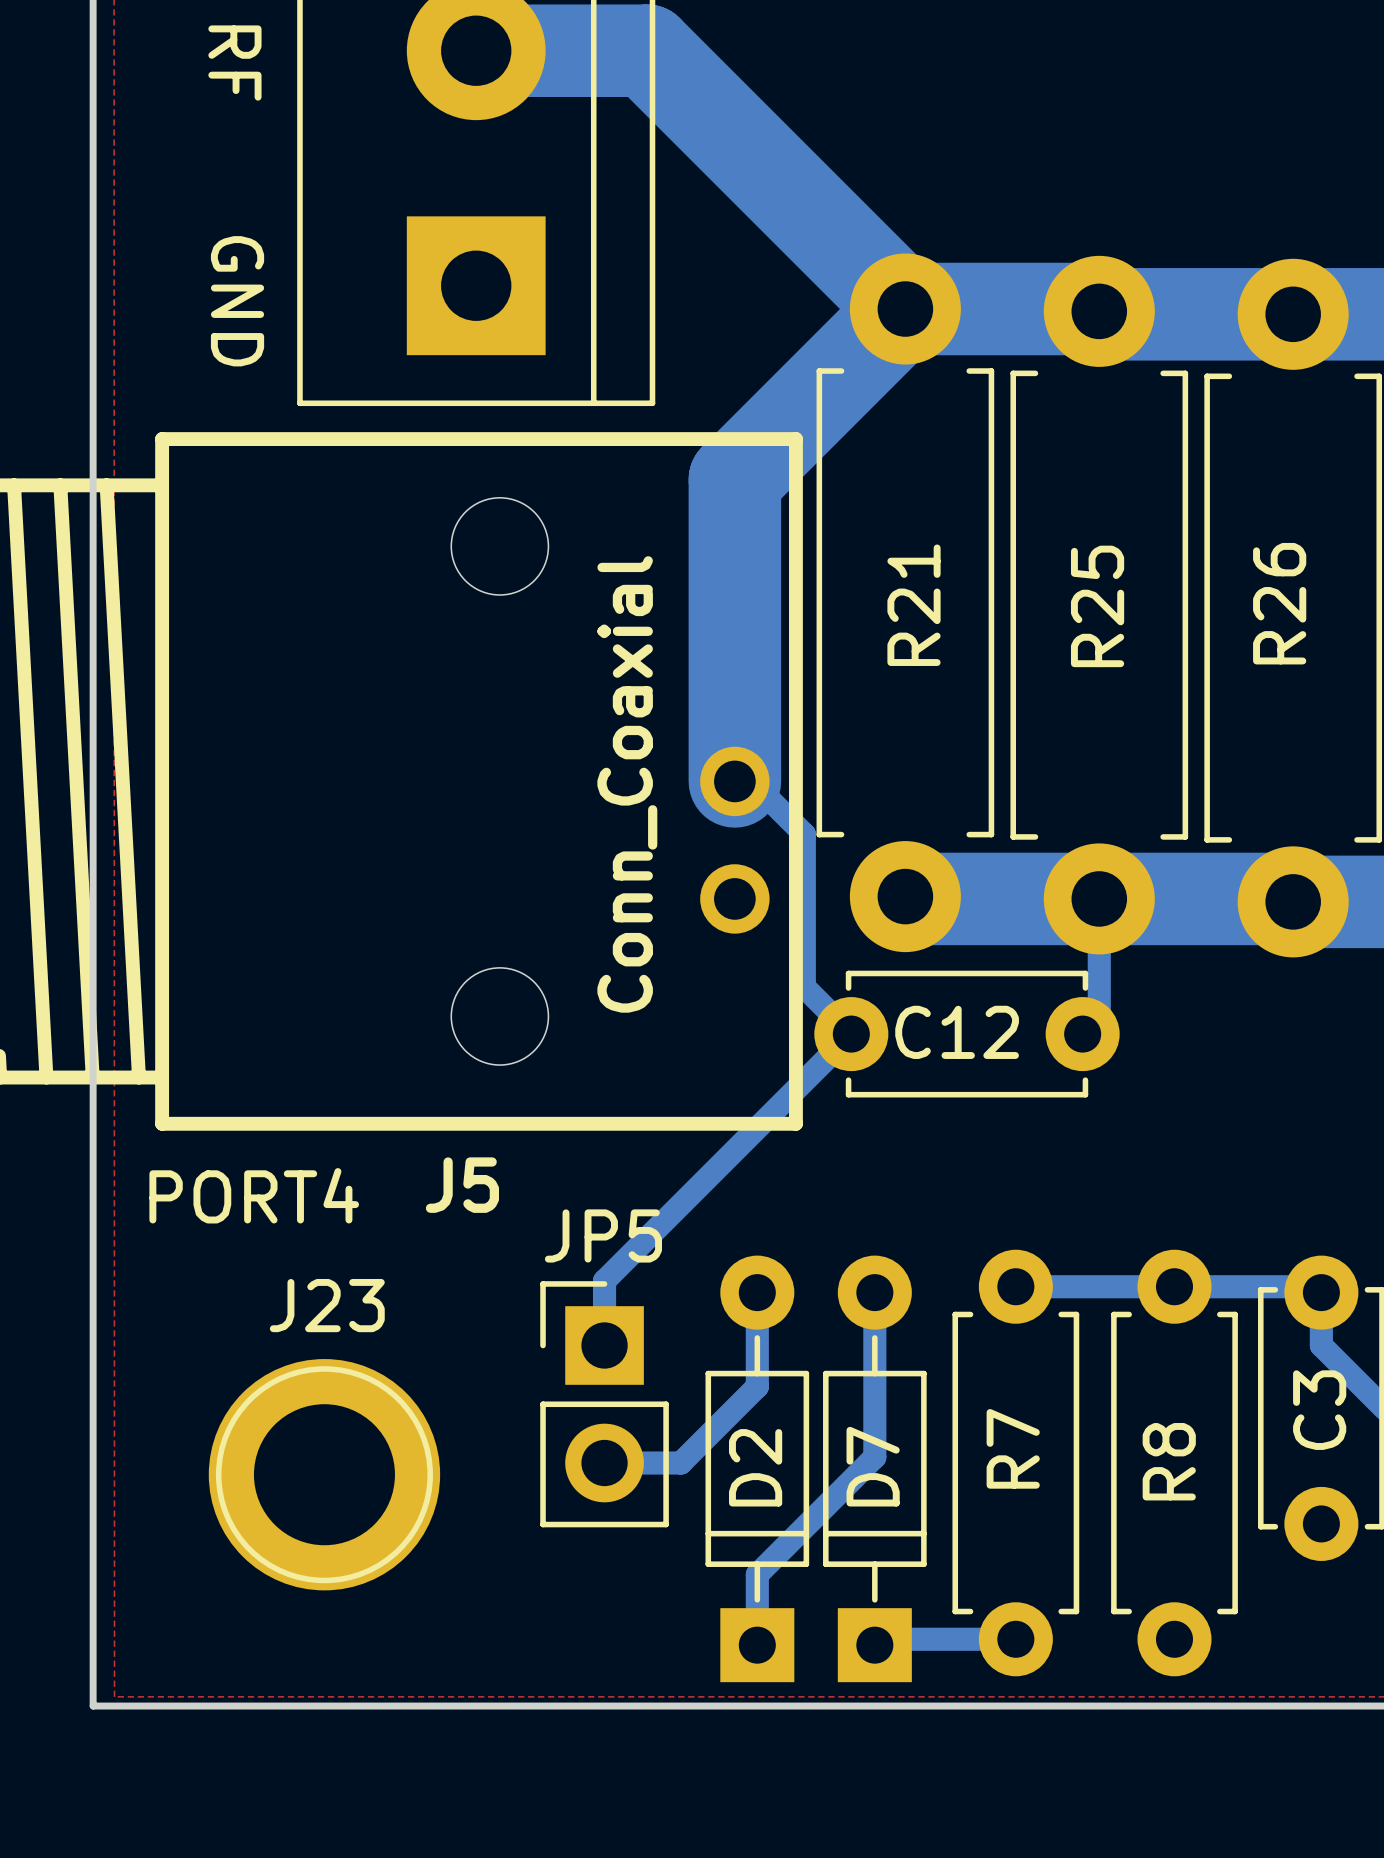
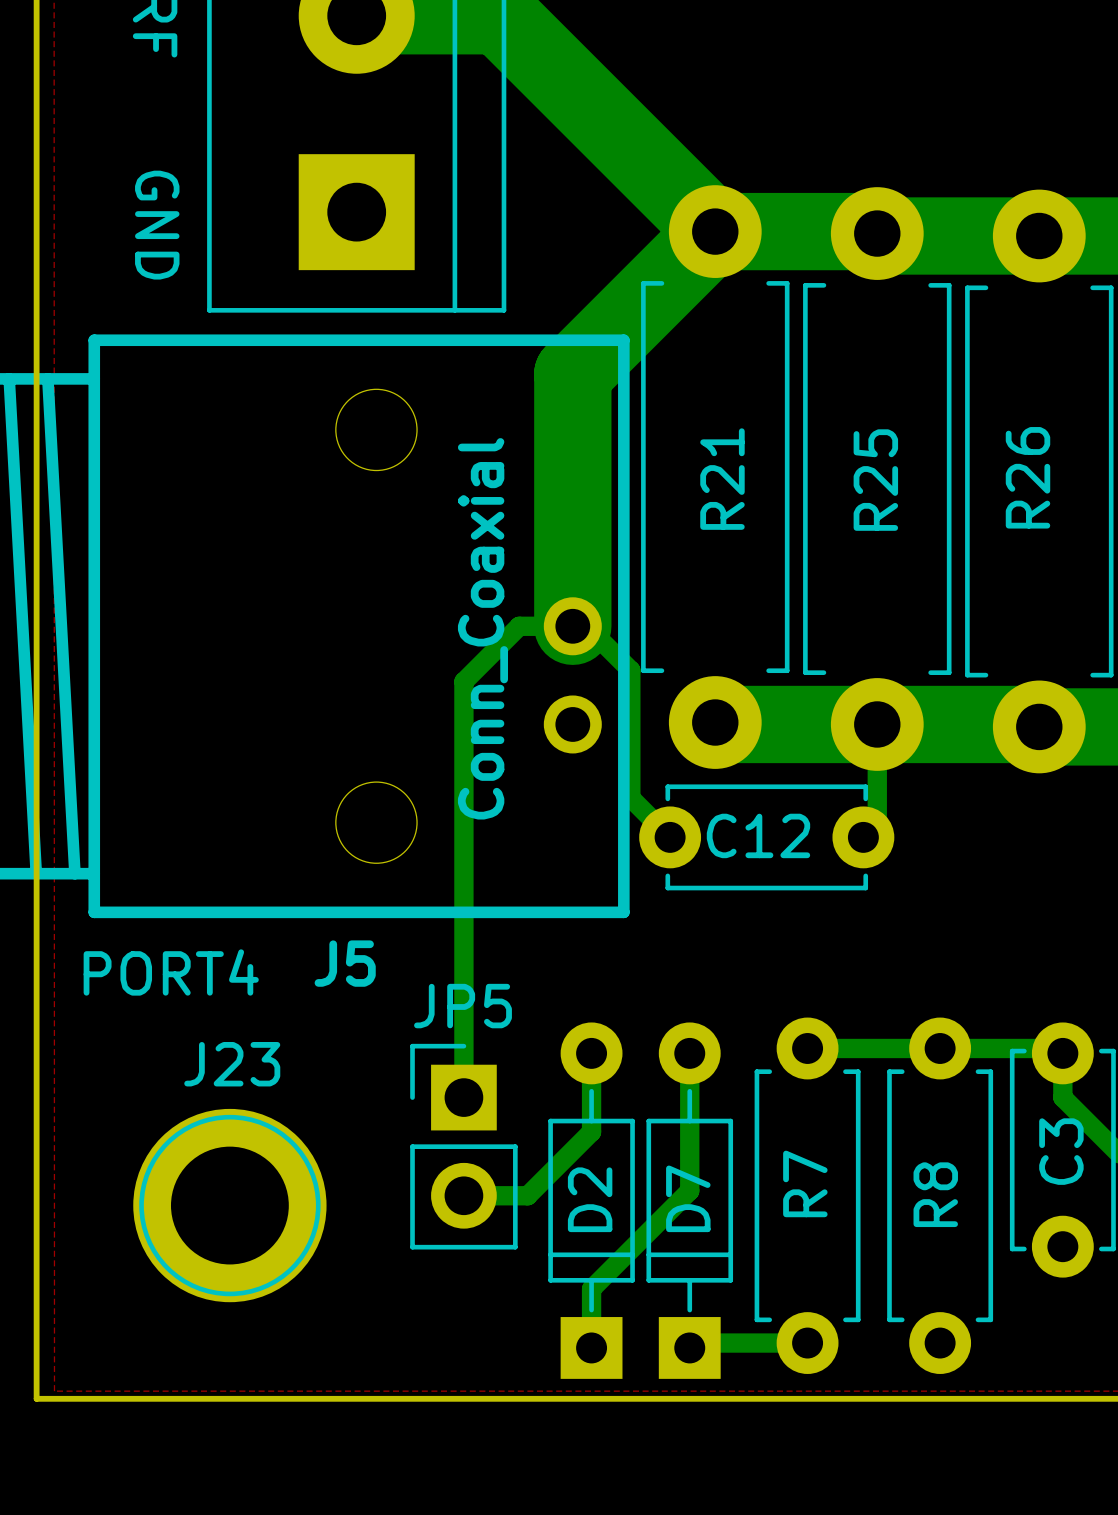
bottom track: (851, 1034) (604, 1280) -> (572, 626) (519, 626) (463, 681) (463, 1043)

